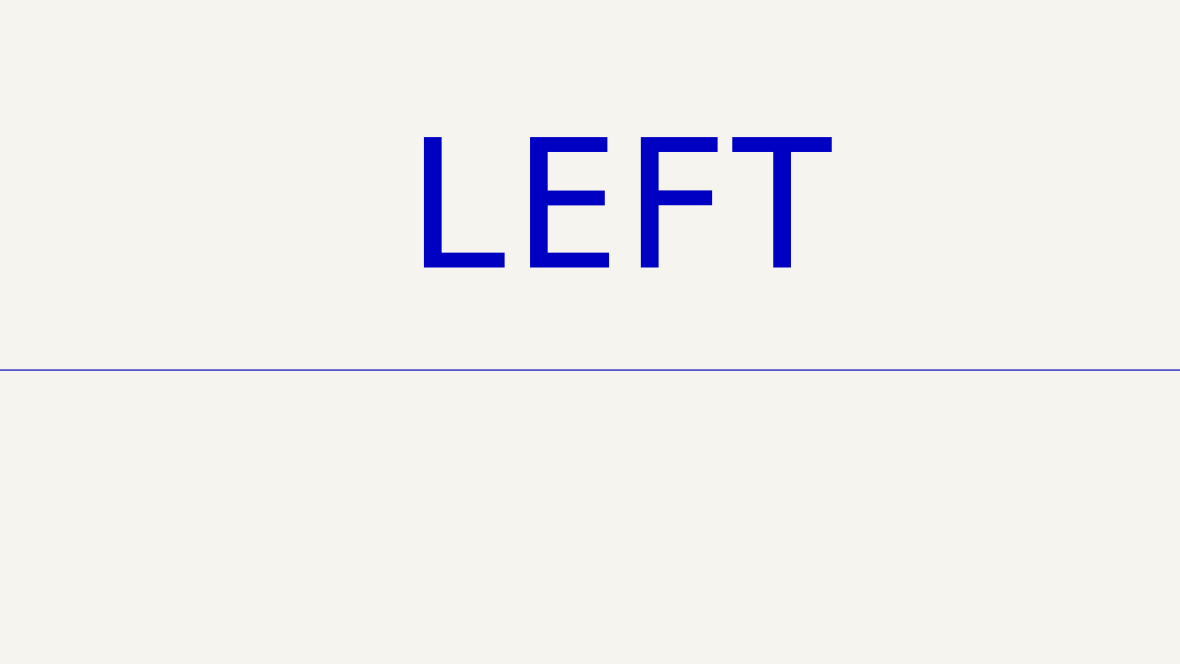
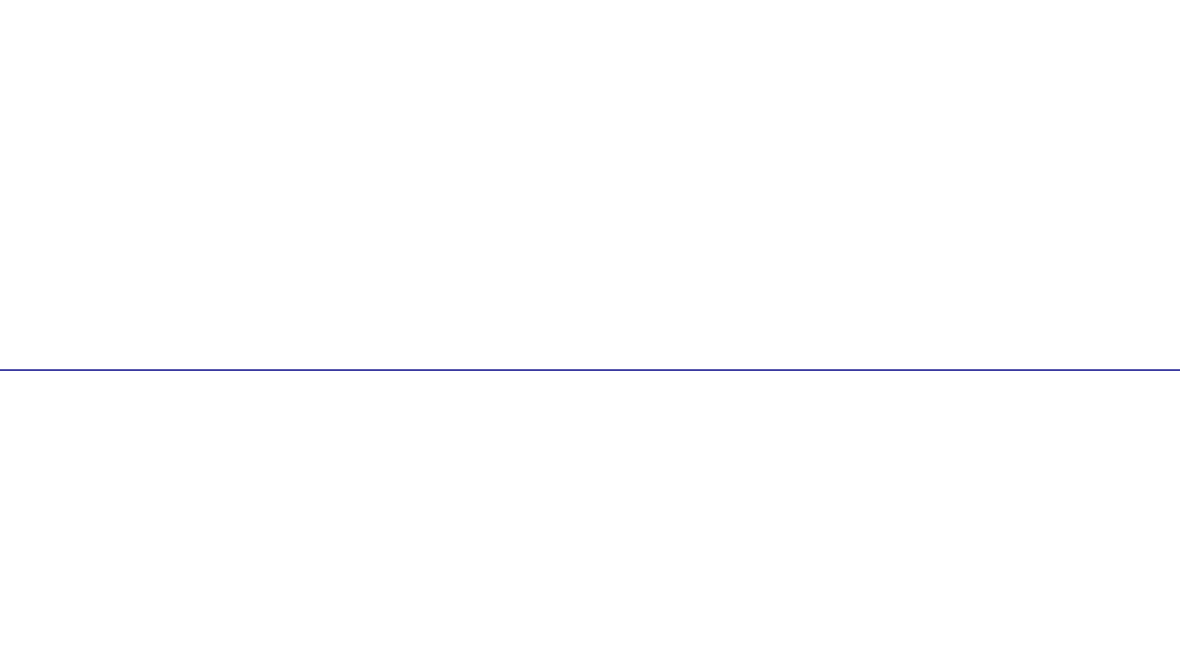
text: LEFT (627, 202) -> none

